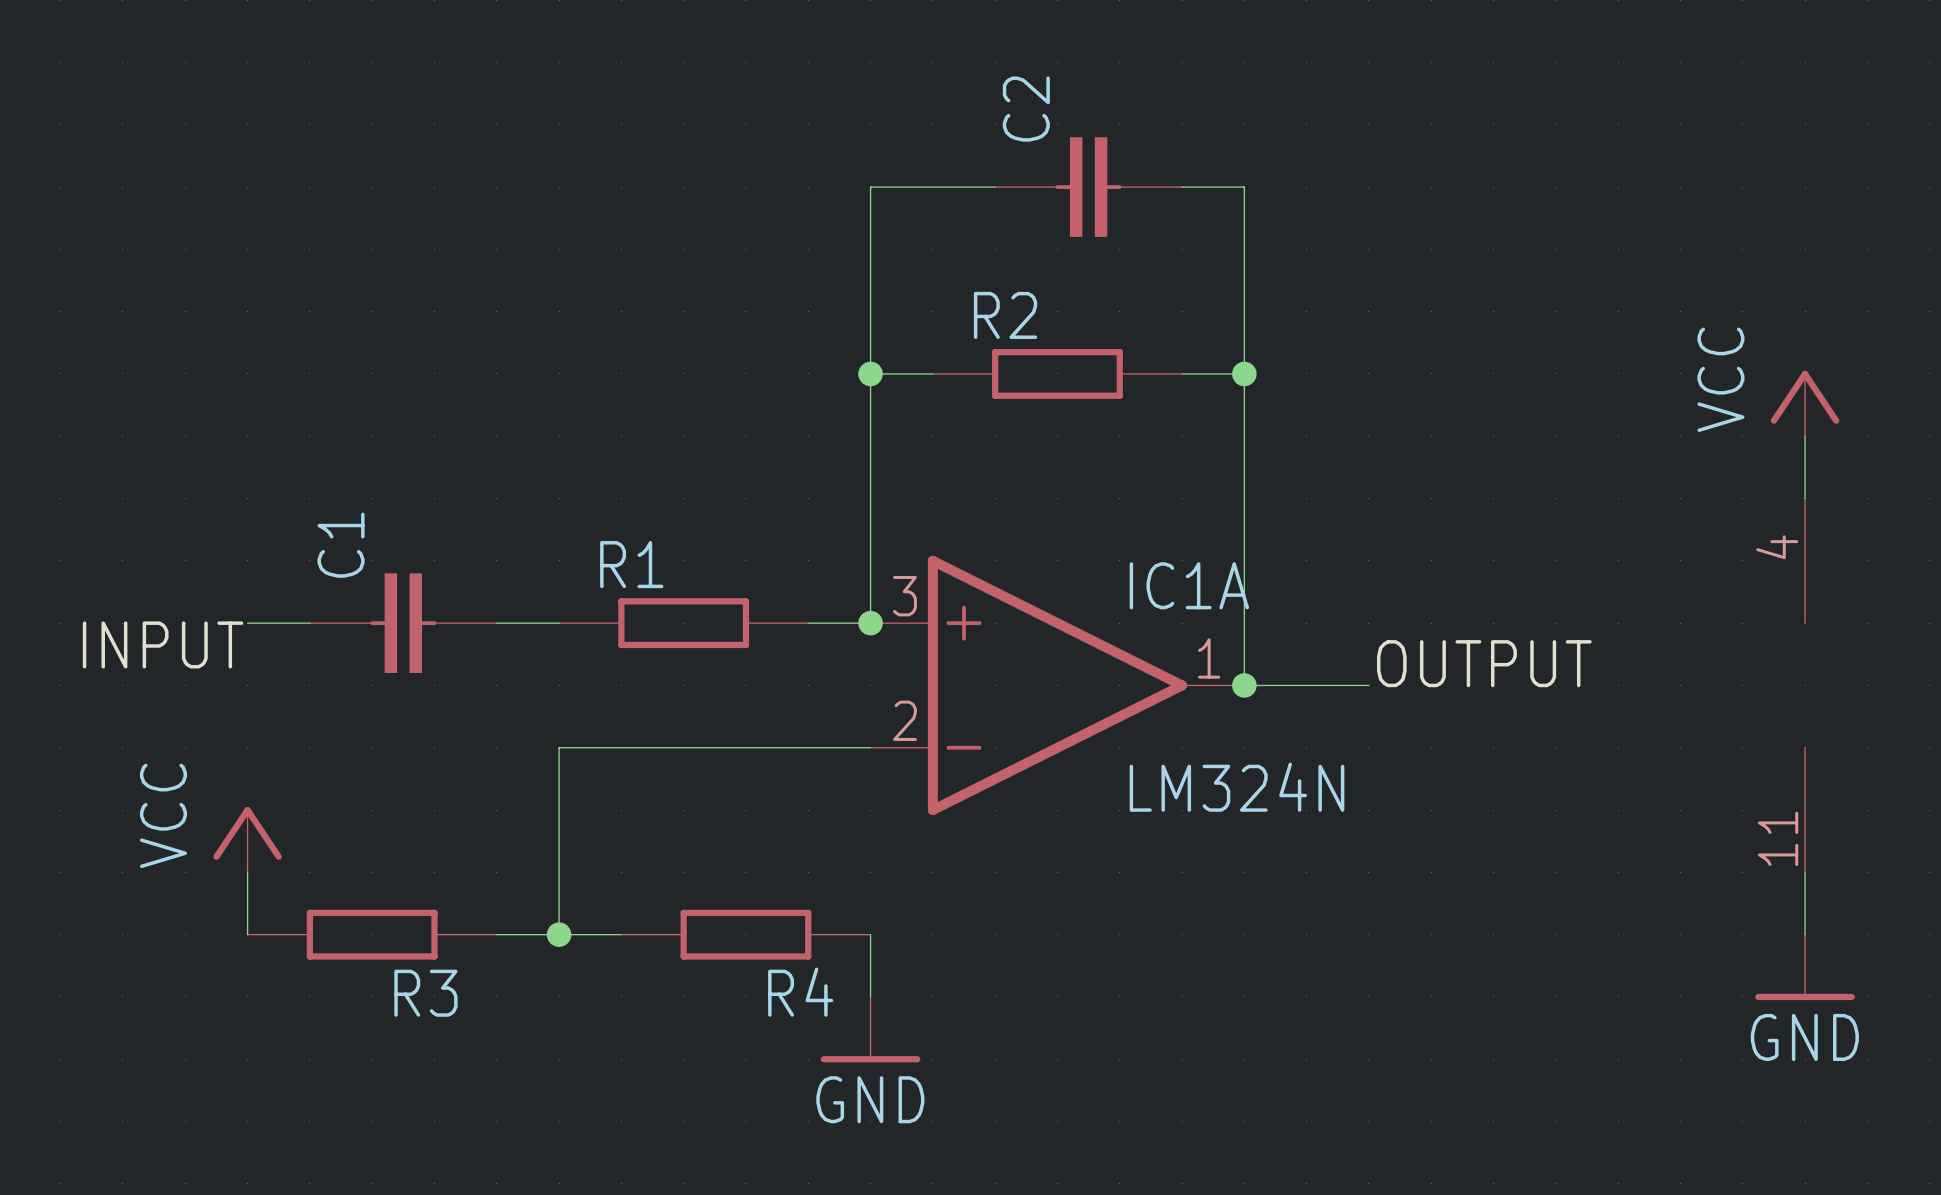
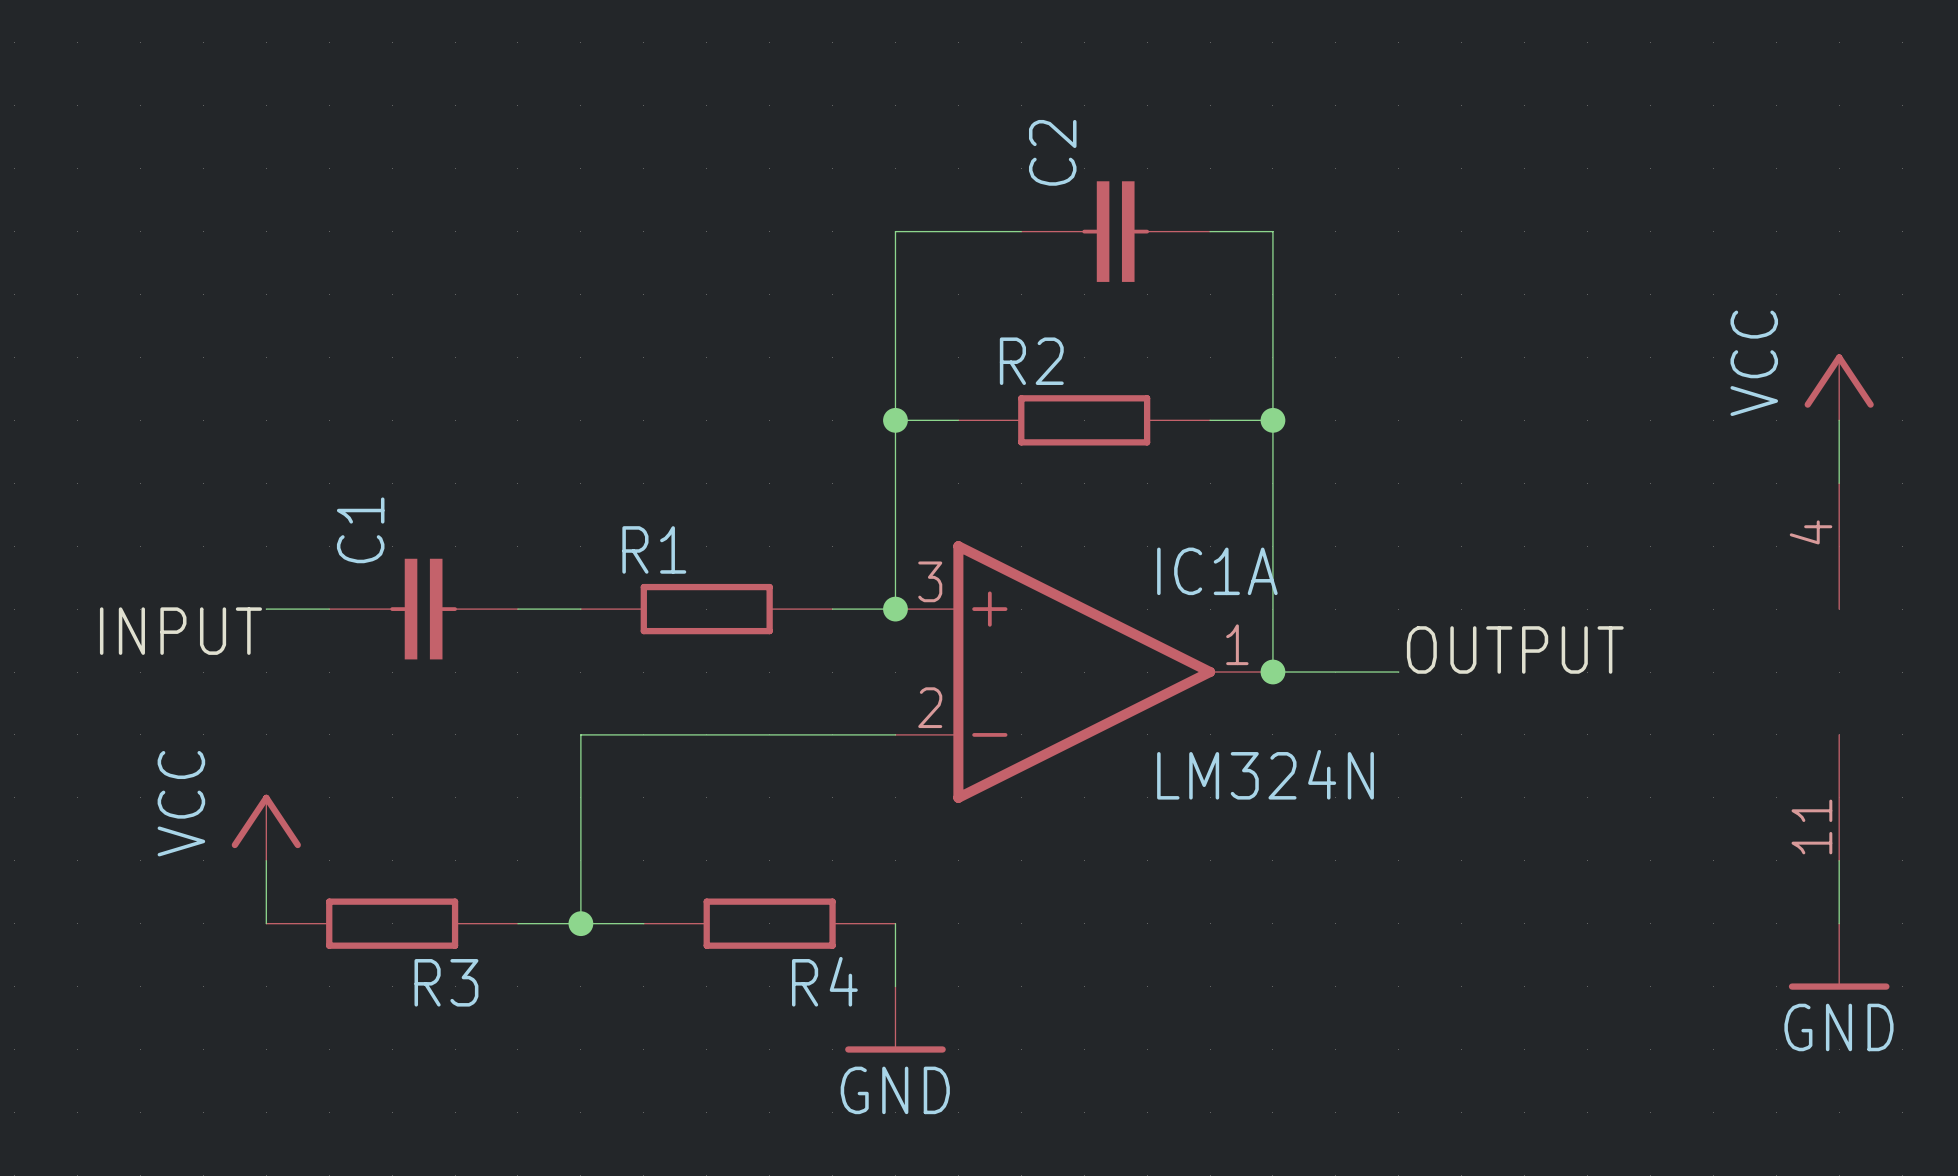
wire: (995, 187) (870, 187) (870, 249) -> (1021, 231) (895, 231)
C2 position: (1088, 187) -> (1115, 231)
wire: (1182, 187) (1244, 187) (1244, 249) -> (1210, 231) (1272, 231)
wire: (870, 373) (932, 373) -> (895, 420) (958, 420)
junction position: (870, 373) -> (895, 420)
R2 position: (1057, 373) -> (1084, 420)
wire: (1182, 373) (1244, 373) -> (1210, 420) (1272, 420)
junction position: (1244, 373) -> (1272, 420)

